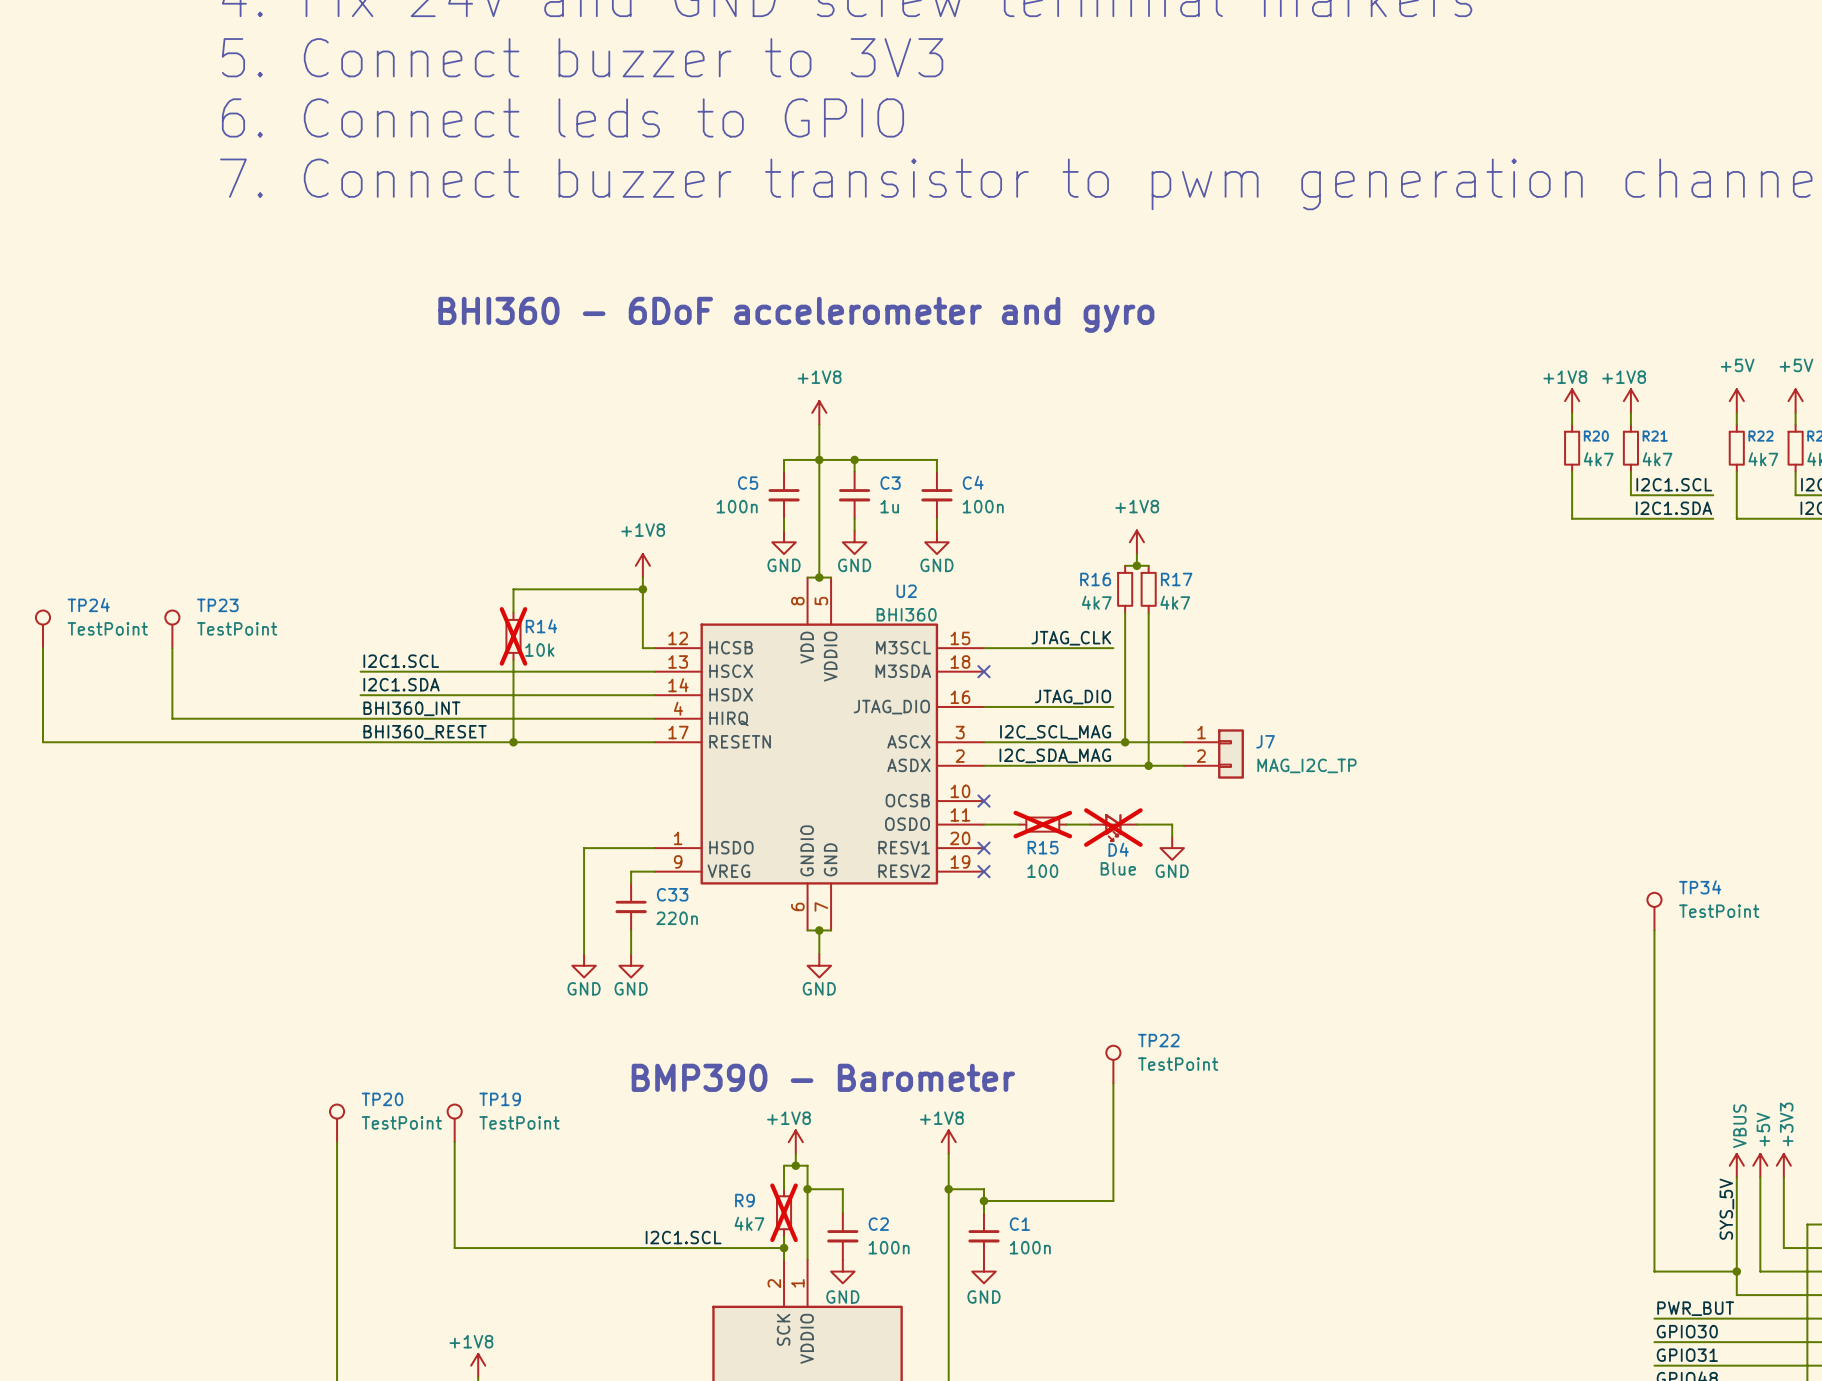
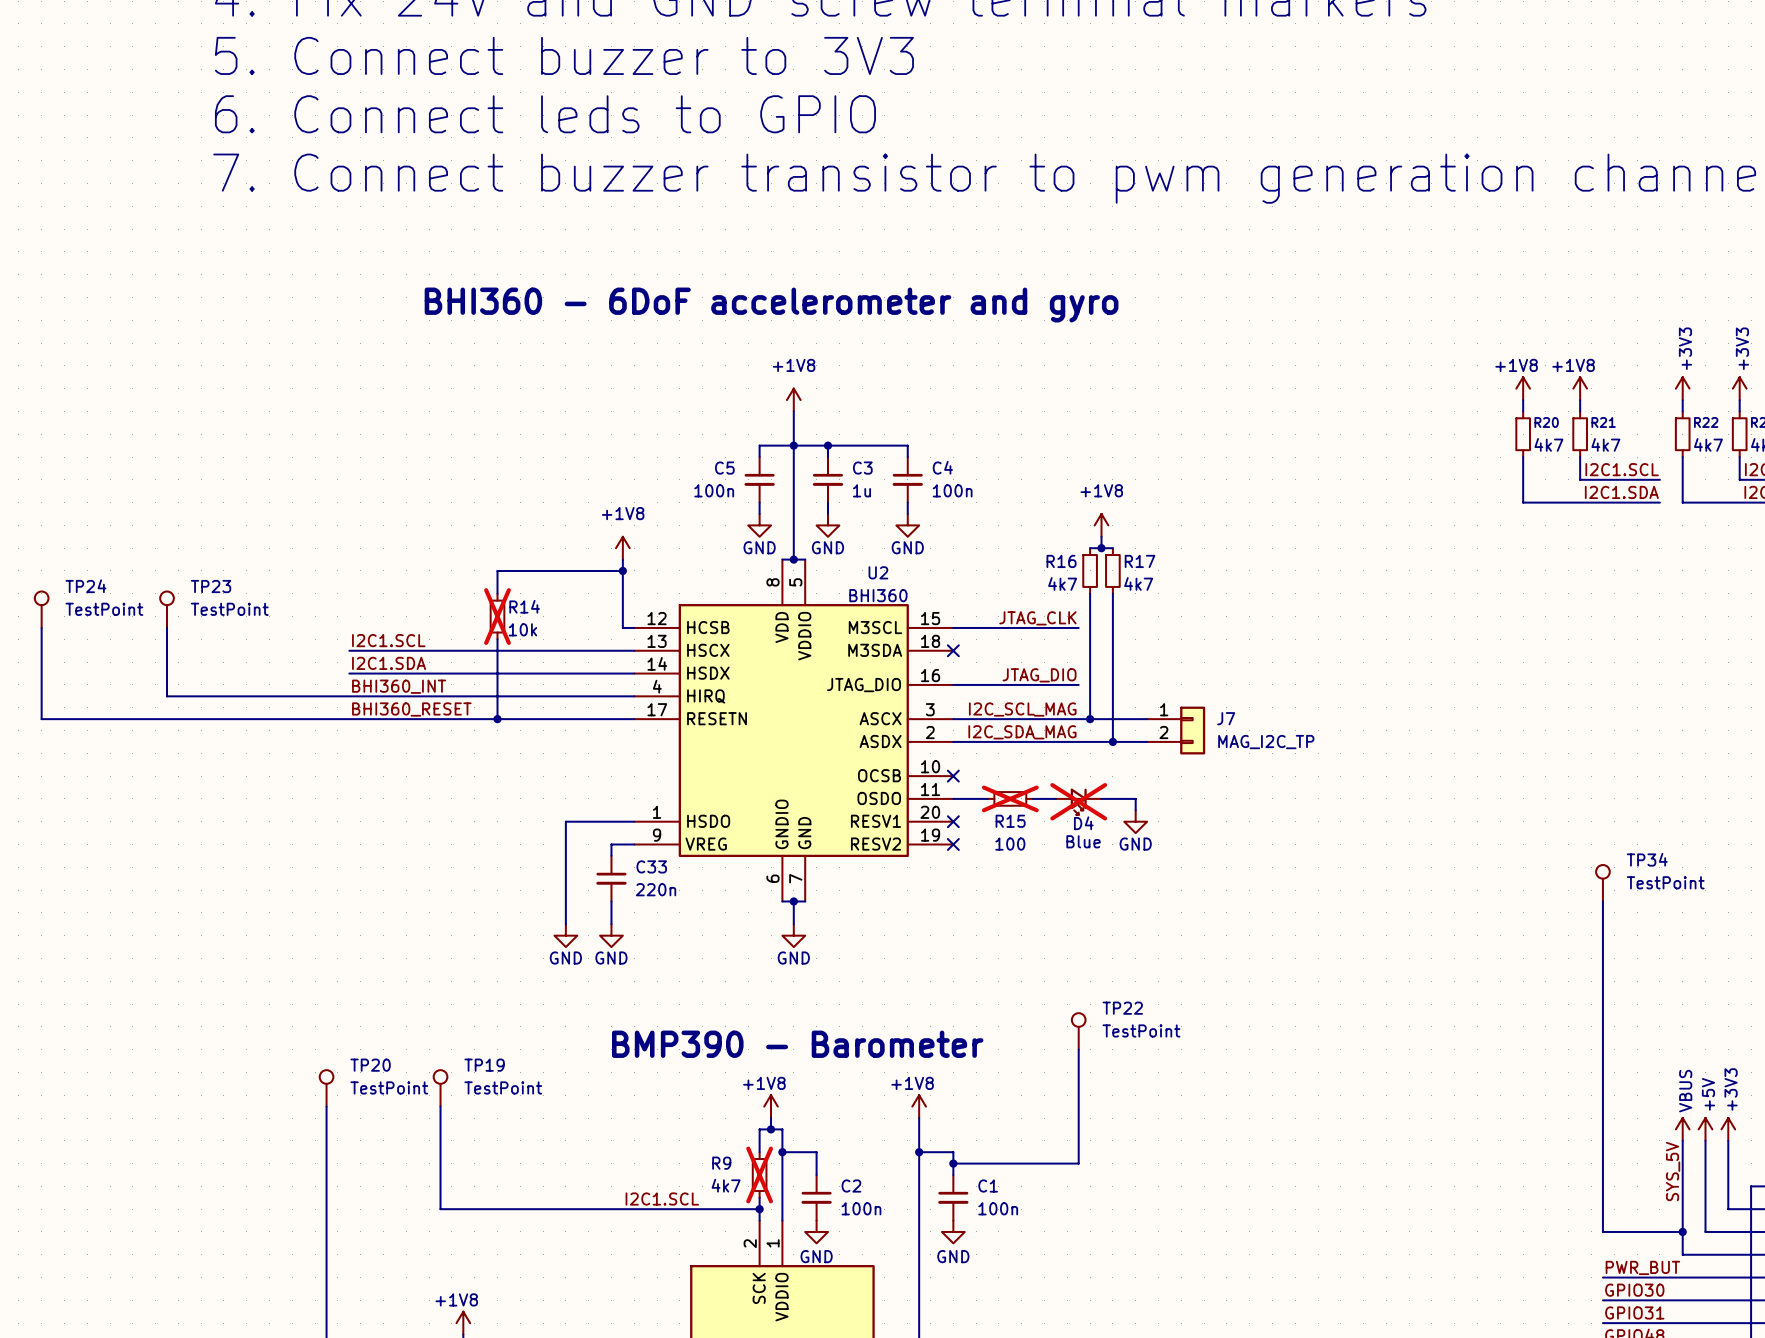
power symbol: +5V (1736, 401) -> +3V3 (1682, 388)
power symbol: +5V (1795, 401) -> +3V3 (1739, 388)

